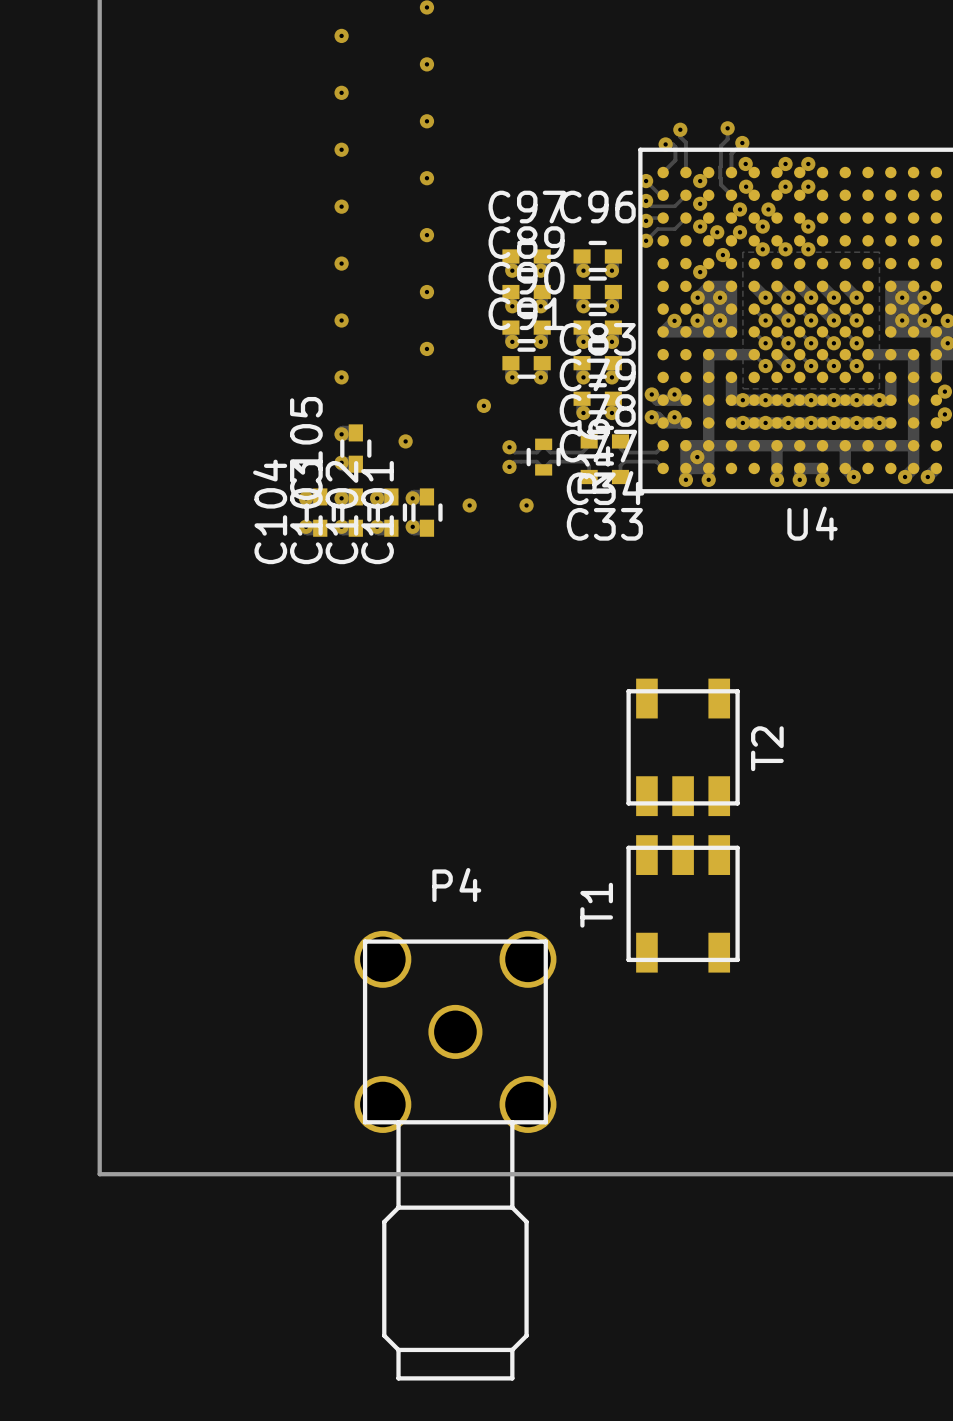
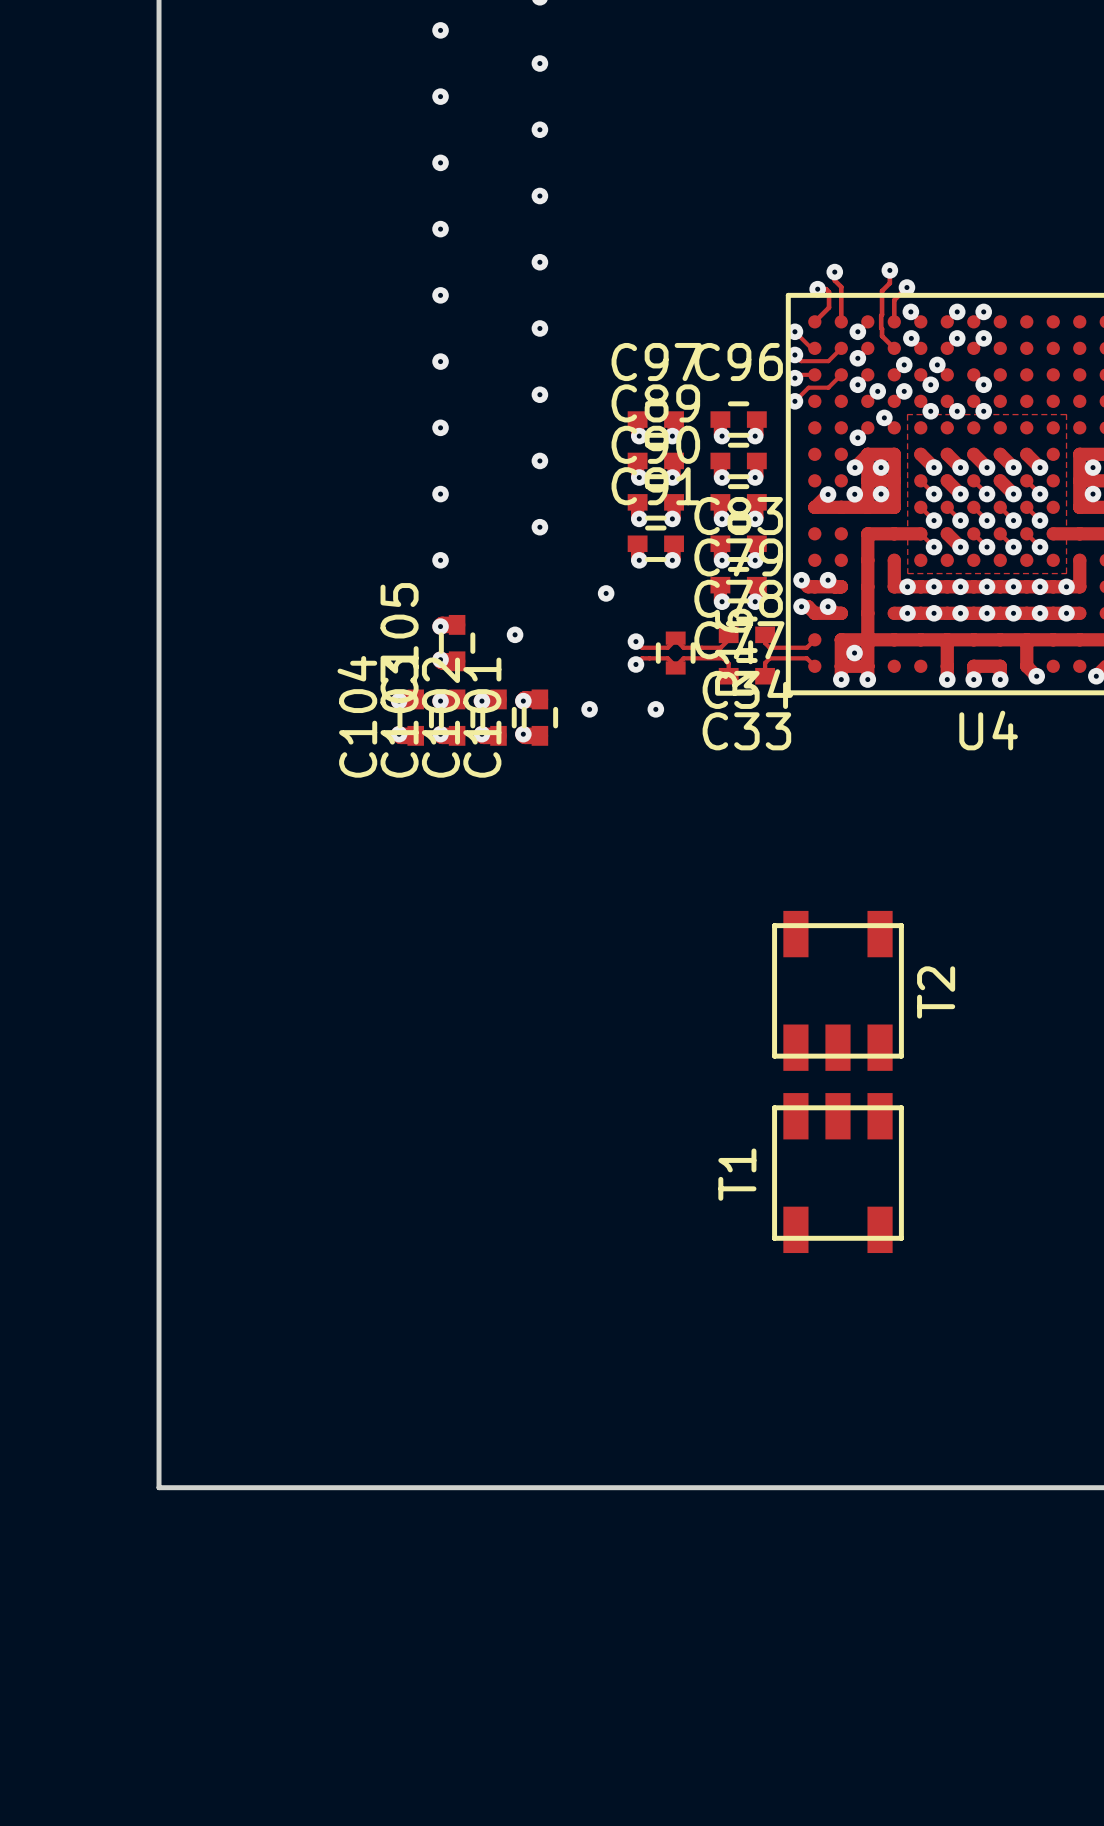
P4: (455, 1155) -> none

